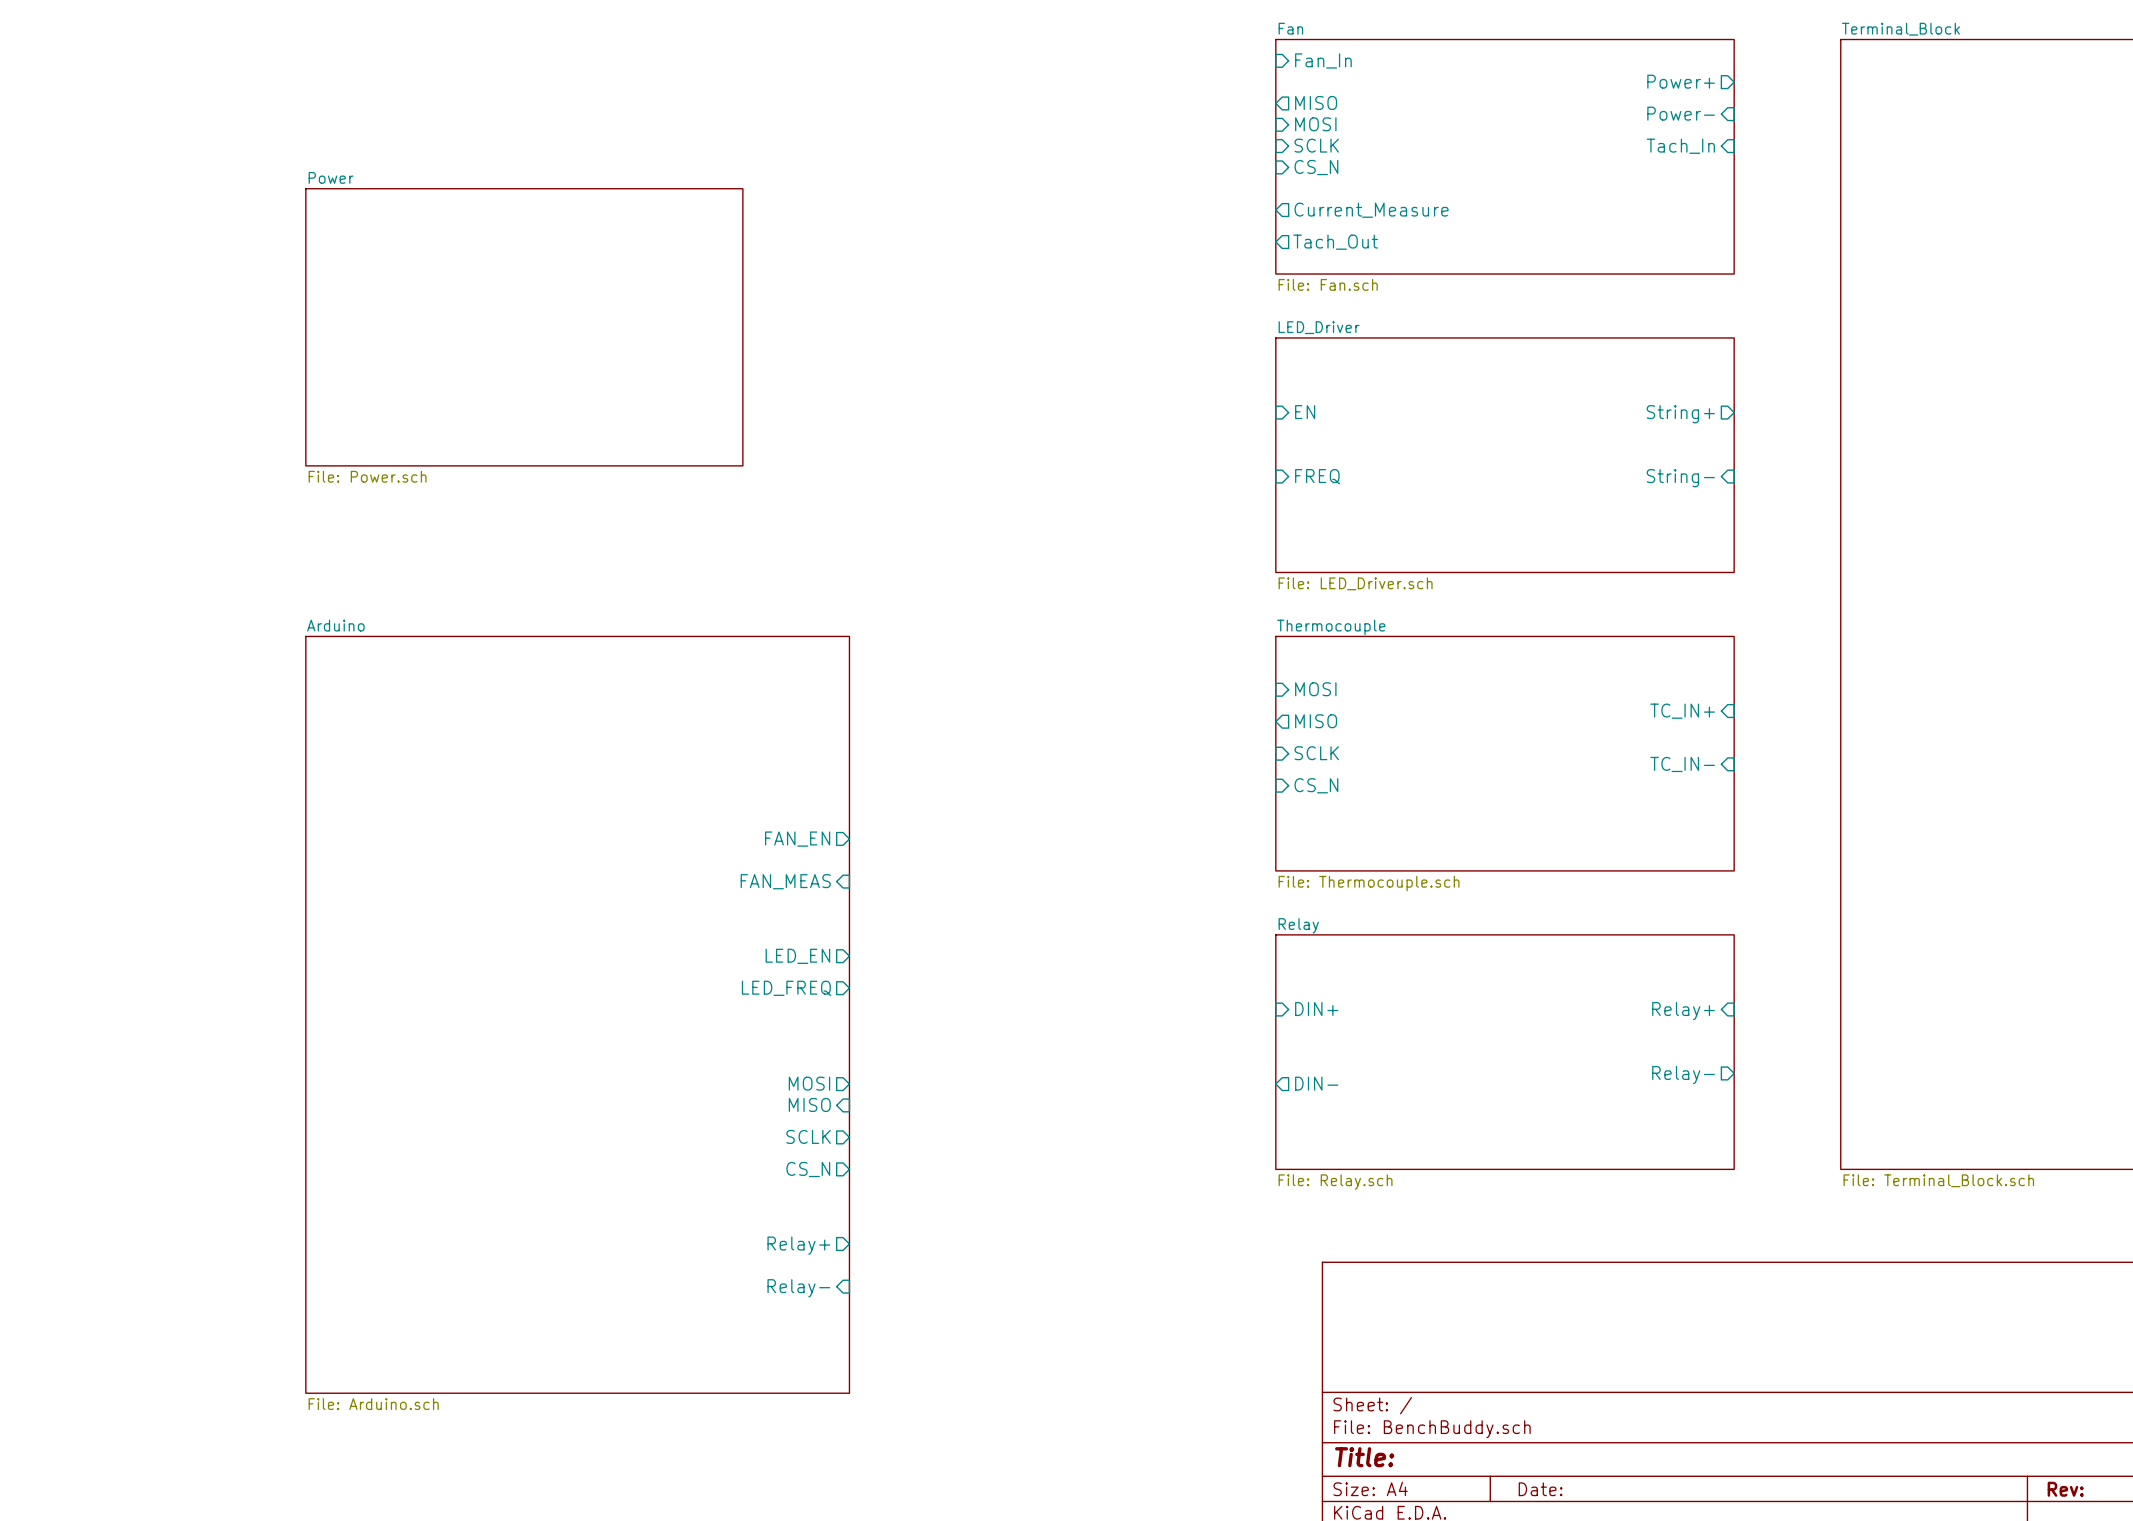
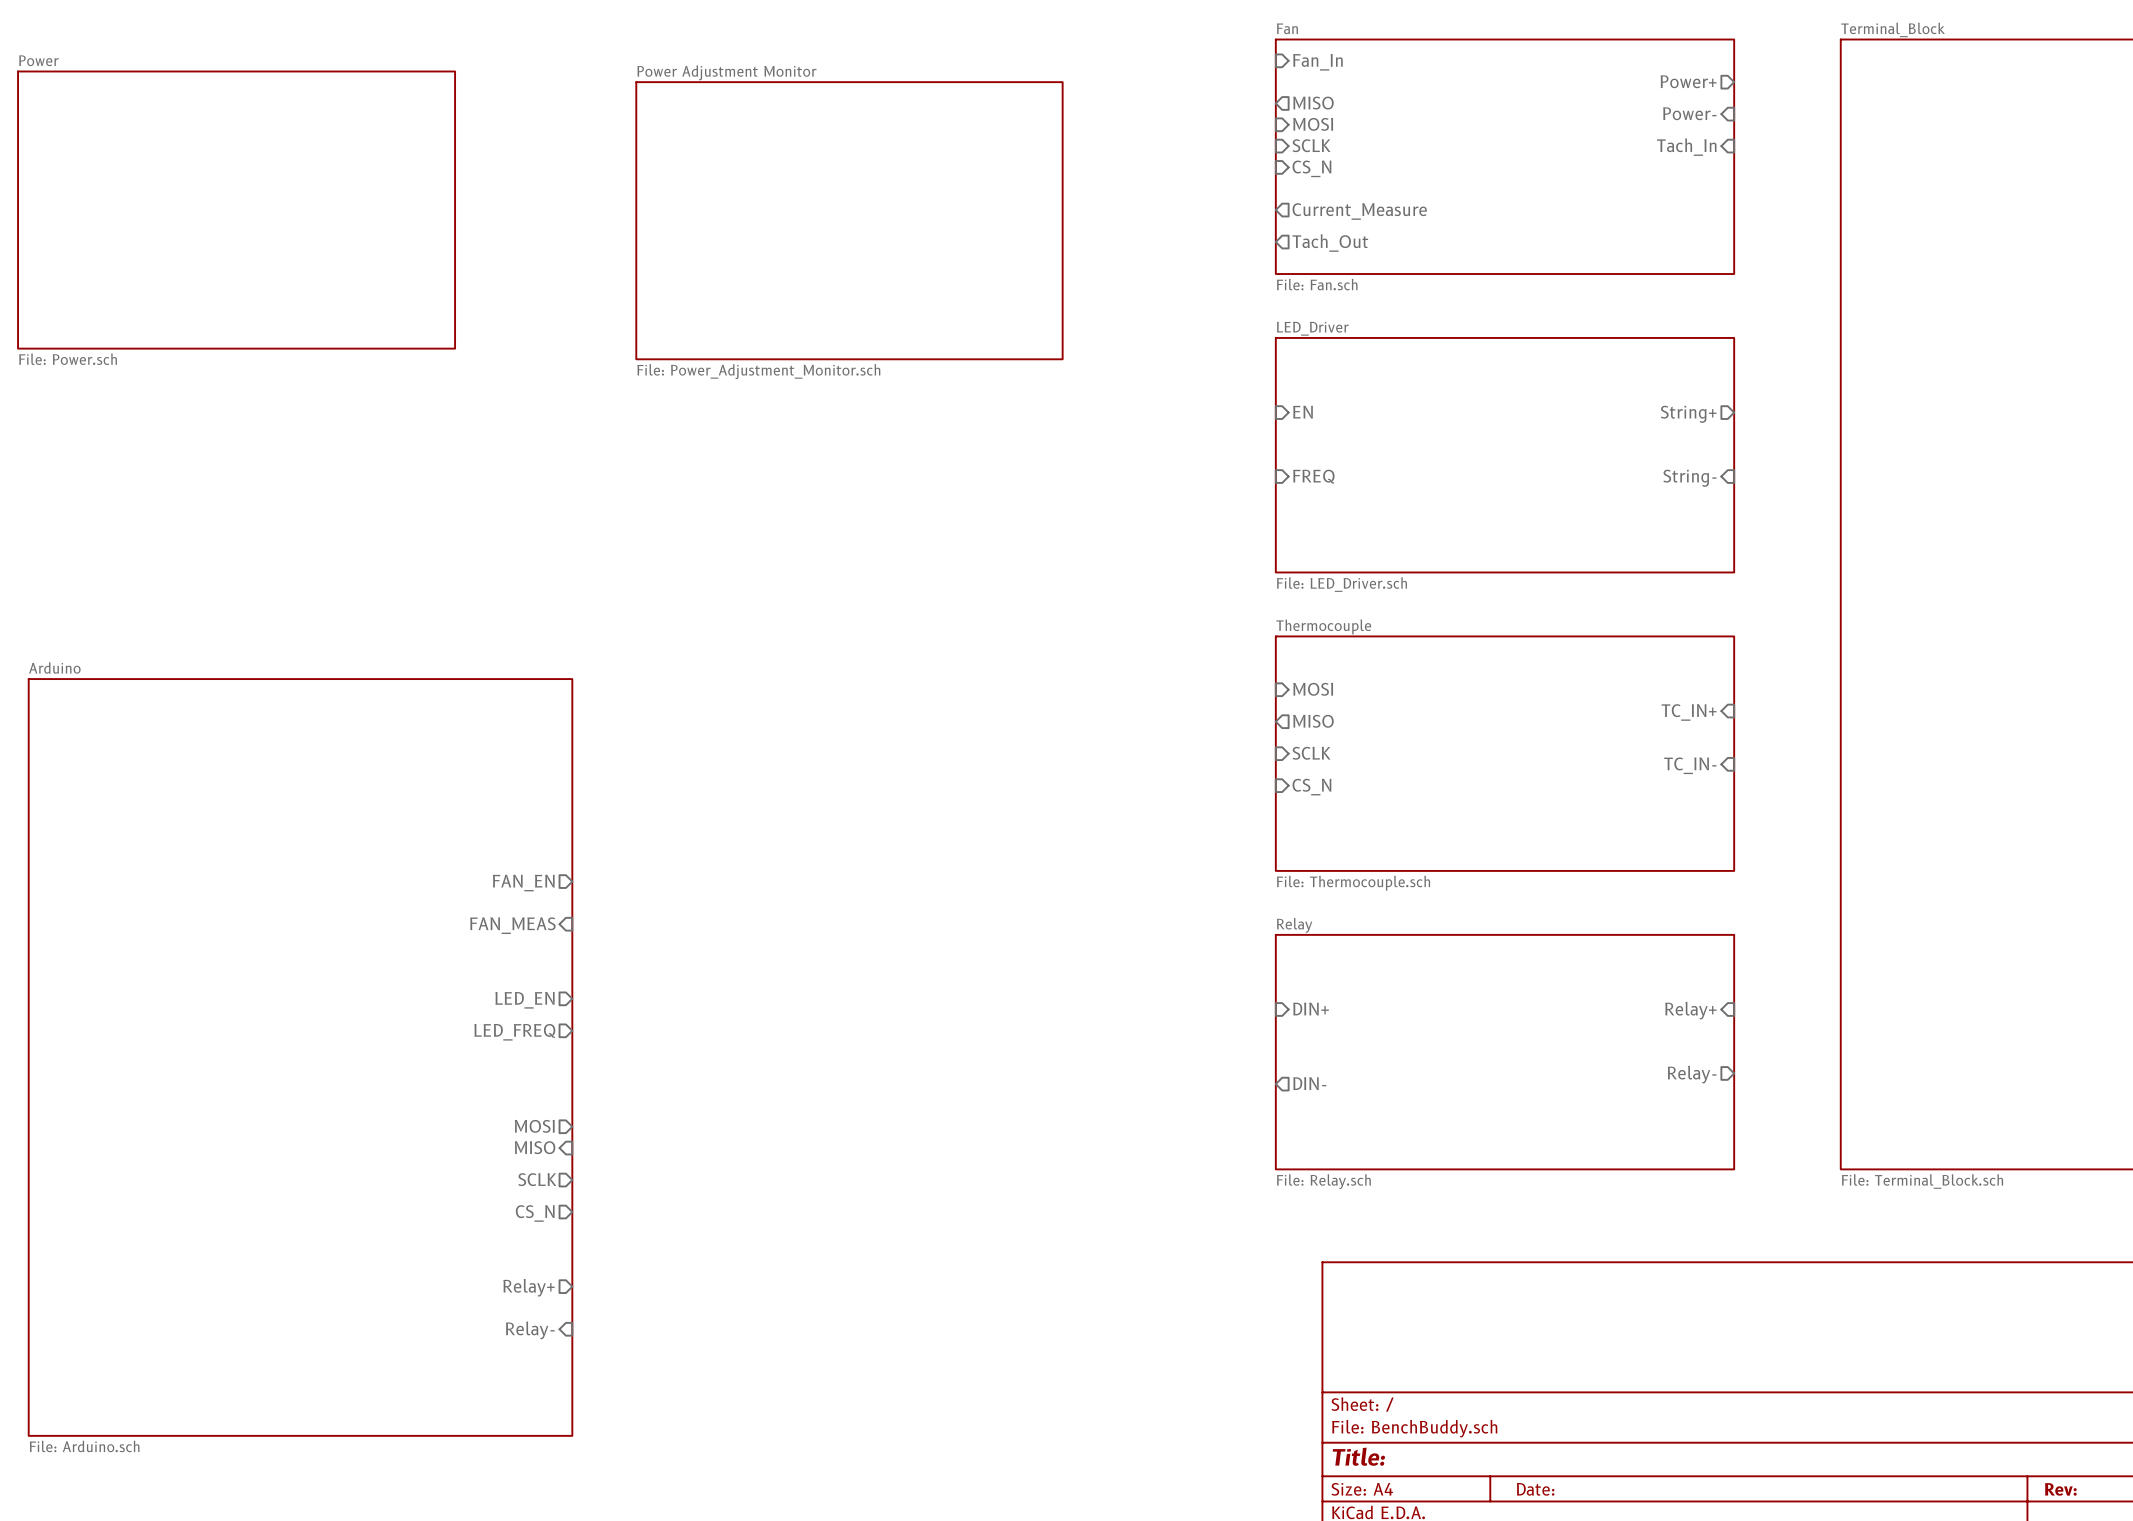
sheet Power: none -> File: Power.sch (236, 210)
sheet Power Adjustment Monitor: none -> File: Power_Adjustment_Monitor.sch (849, 220)
sheet Power: File: Power.sch (524, 327) -> none
sheet pin: FAN_EN (797, 839) -> none
sheet pin: none -> FAN_EN (523, 883)
sheet pin: FAN_MEAS (785, 881) -> none
sheet pin: none -> FAN_MEAS (512, 925)
sheet pin: LED_EN (797, 956) -> none
sheet pin: LED_FREQ (786, 988) -> none
sheet pin: none -> LED_EN (525, 1000)
sheet Arduino: File: Arduino.sch (577, 1014) -> none
sheet pin: none -> LED_FREQ (514, 1032)
sheet Arduino: none -> File: Arduino.sch (300, 1057)
sheet pin: MOSI (809, 1083) -> none
sheet pin: MISO (809, 1104) -> none
sheet pin: none -> MOSI (534, 1126)
sheet pin: SCLK (808, 1136) -> none
sheet pin: none -> MISO (535, 1147)
sheet pin: CS_N (808, 1169) -> none
sheet pin: none -> SCLK (537, 1179)
sheet pin: none -> CS_N (535, 1213)
sheet pin: Relay+ (798, 1245) -> none
sheet pin: none -> Relay+ (529, 1287)
sheet pin: Relay- (798, 1288) -> none
sheet pin: none -> Relay- (530, 1330)

